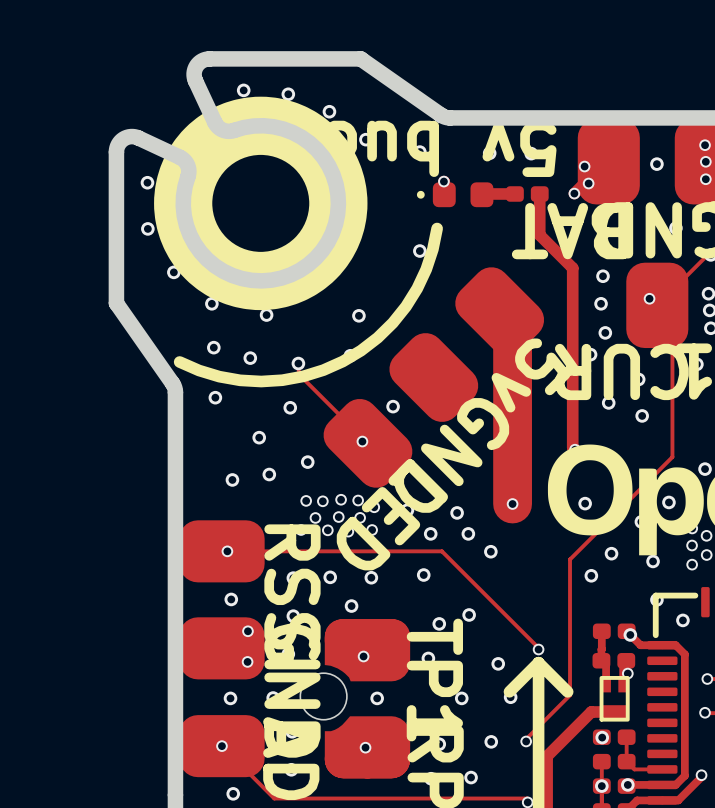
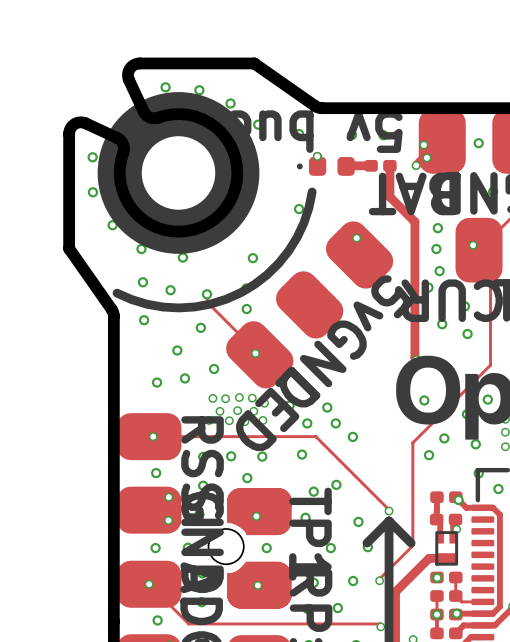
track: (499, 311) (512, 324) (512, 504) -> none
via position: (393, 406) -> (246, 309)
via position: (512, 504) -> (356, 238)

